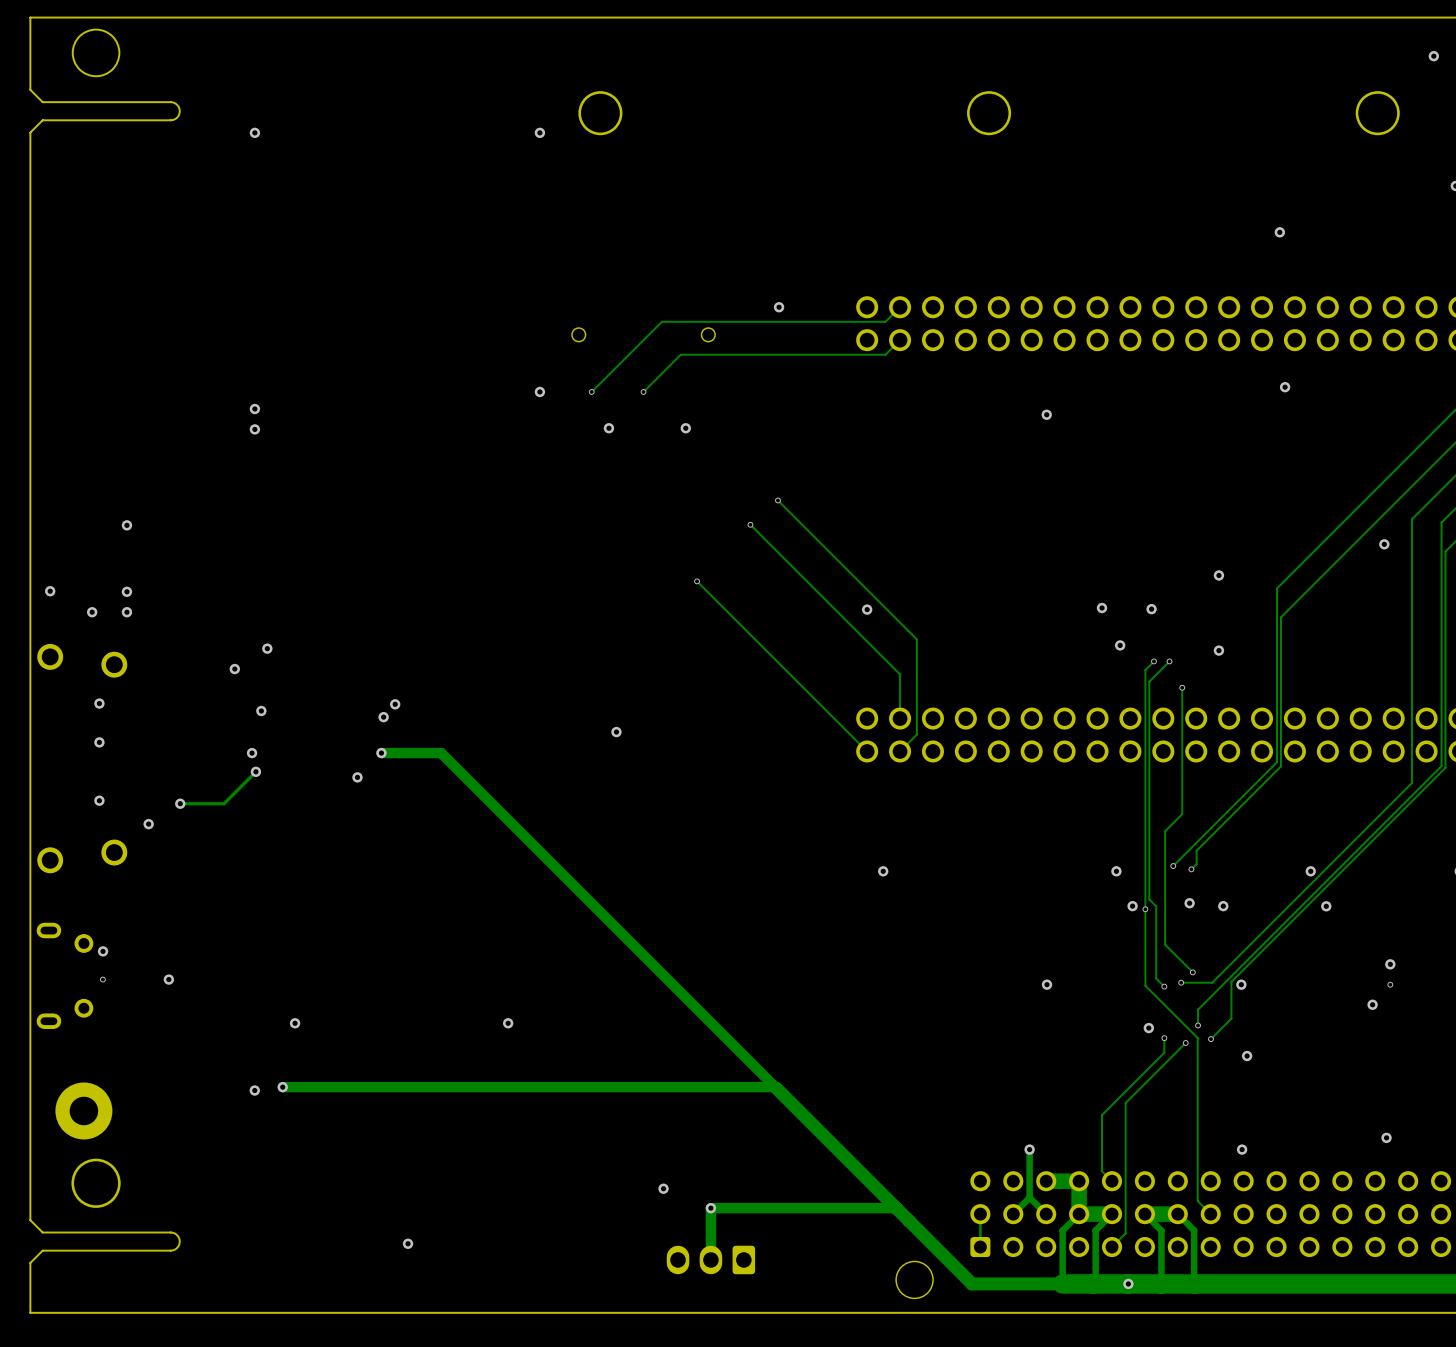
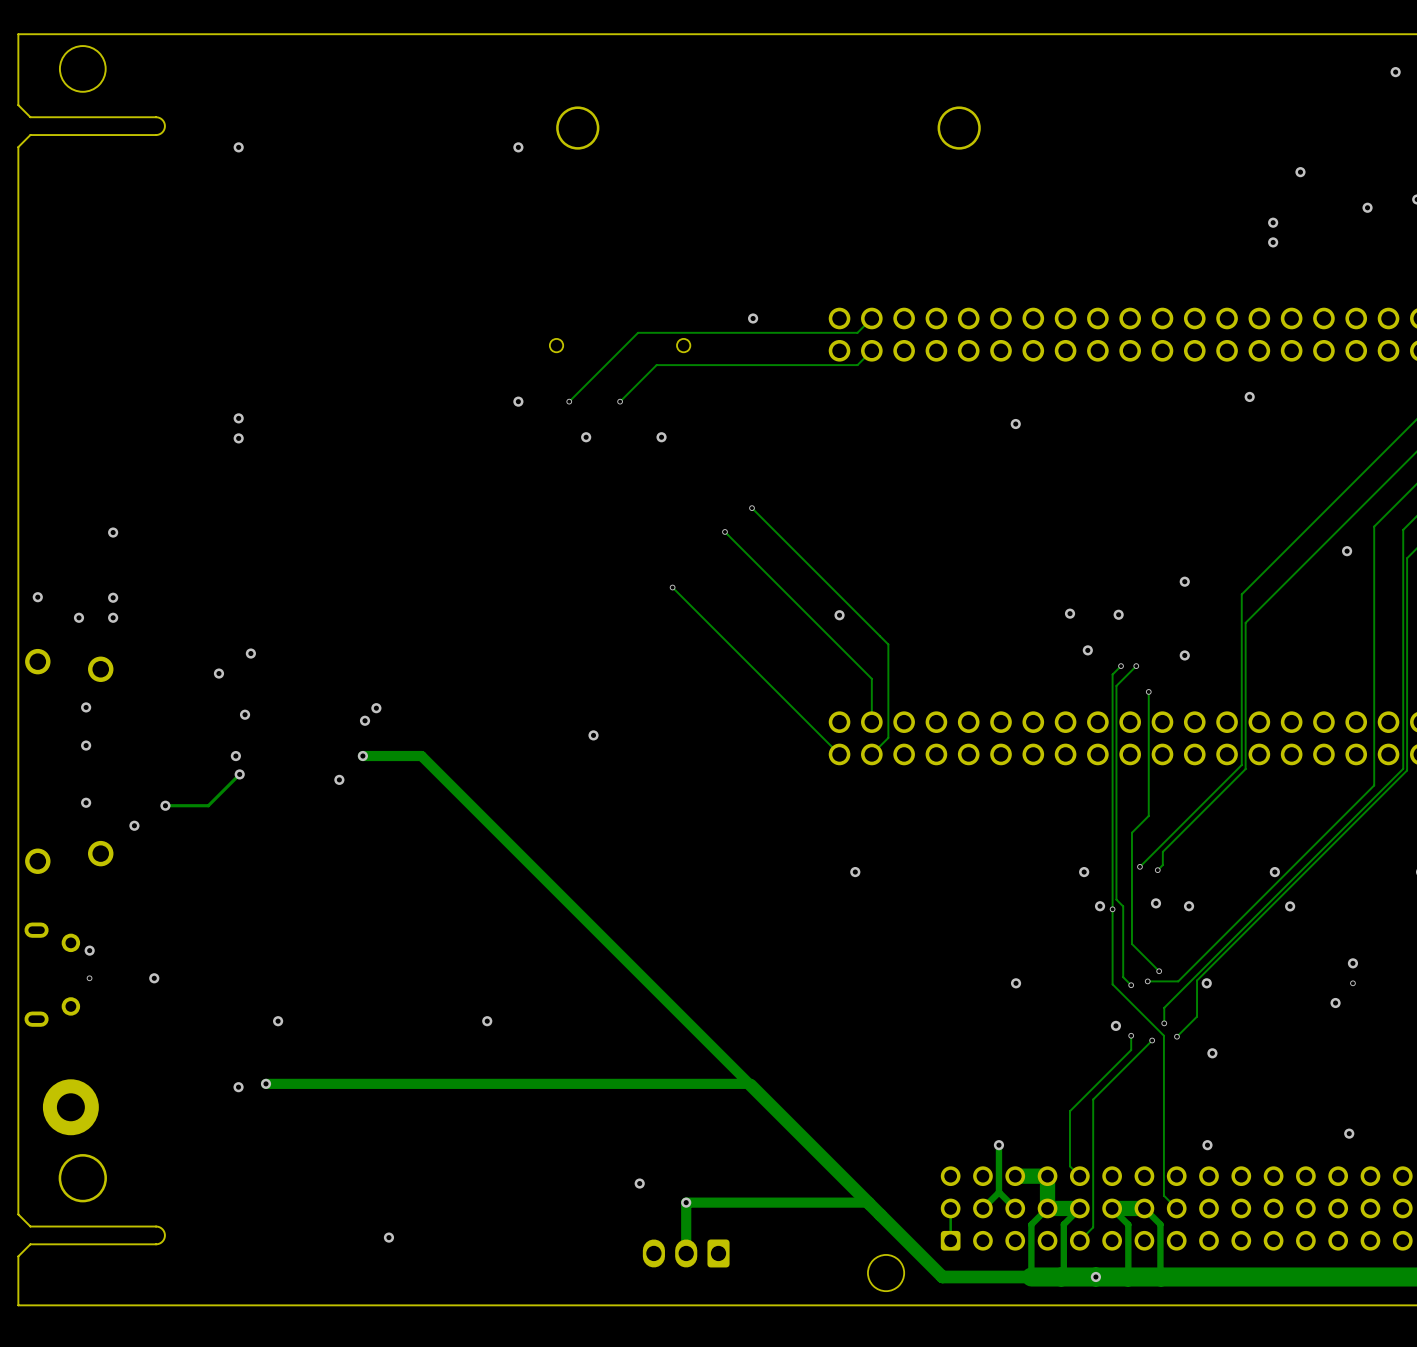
round board edge: [1355, 91, 1400, 136] -> none
via: none -> (1300, 172)
via: none -> (1367, 207)
via: none -> (1273, 222)
via: none -> (1273, 242)
via: (1279, 232) -> none

